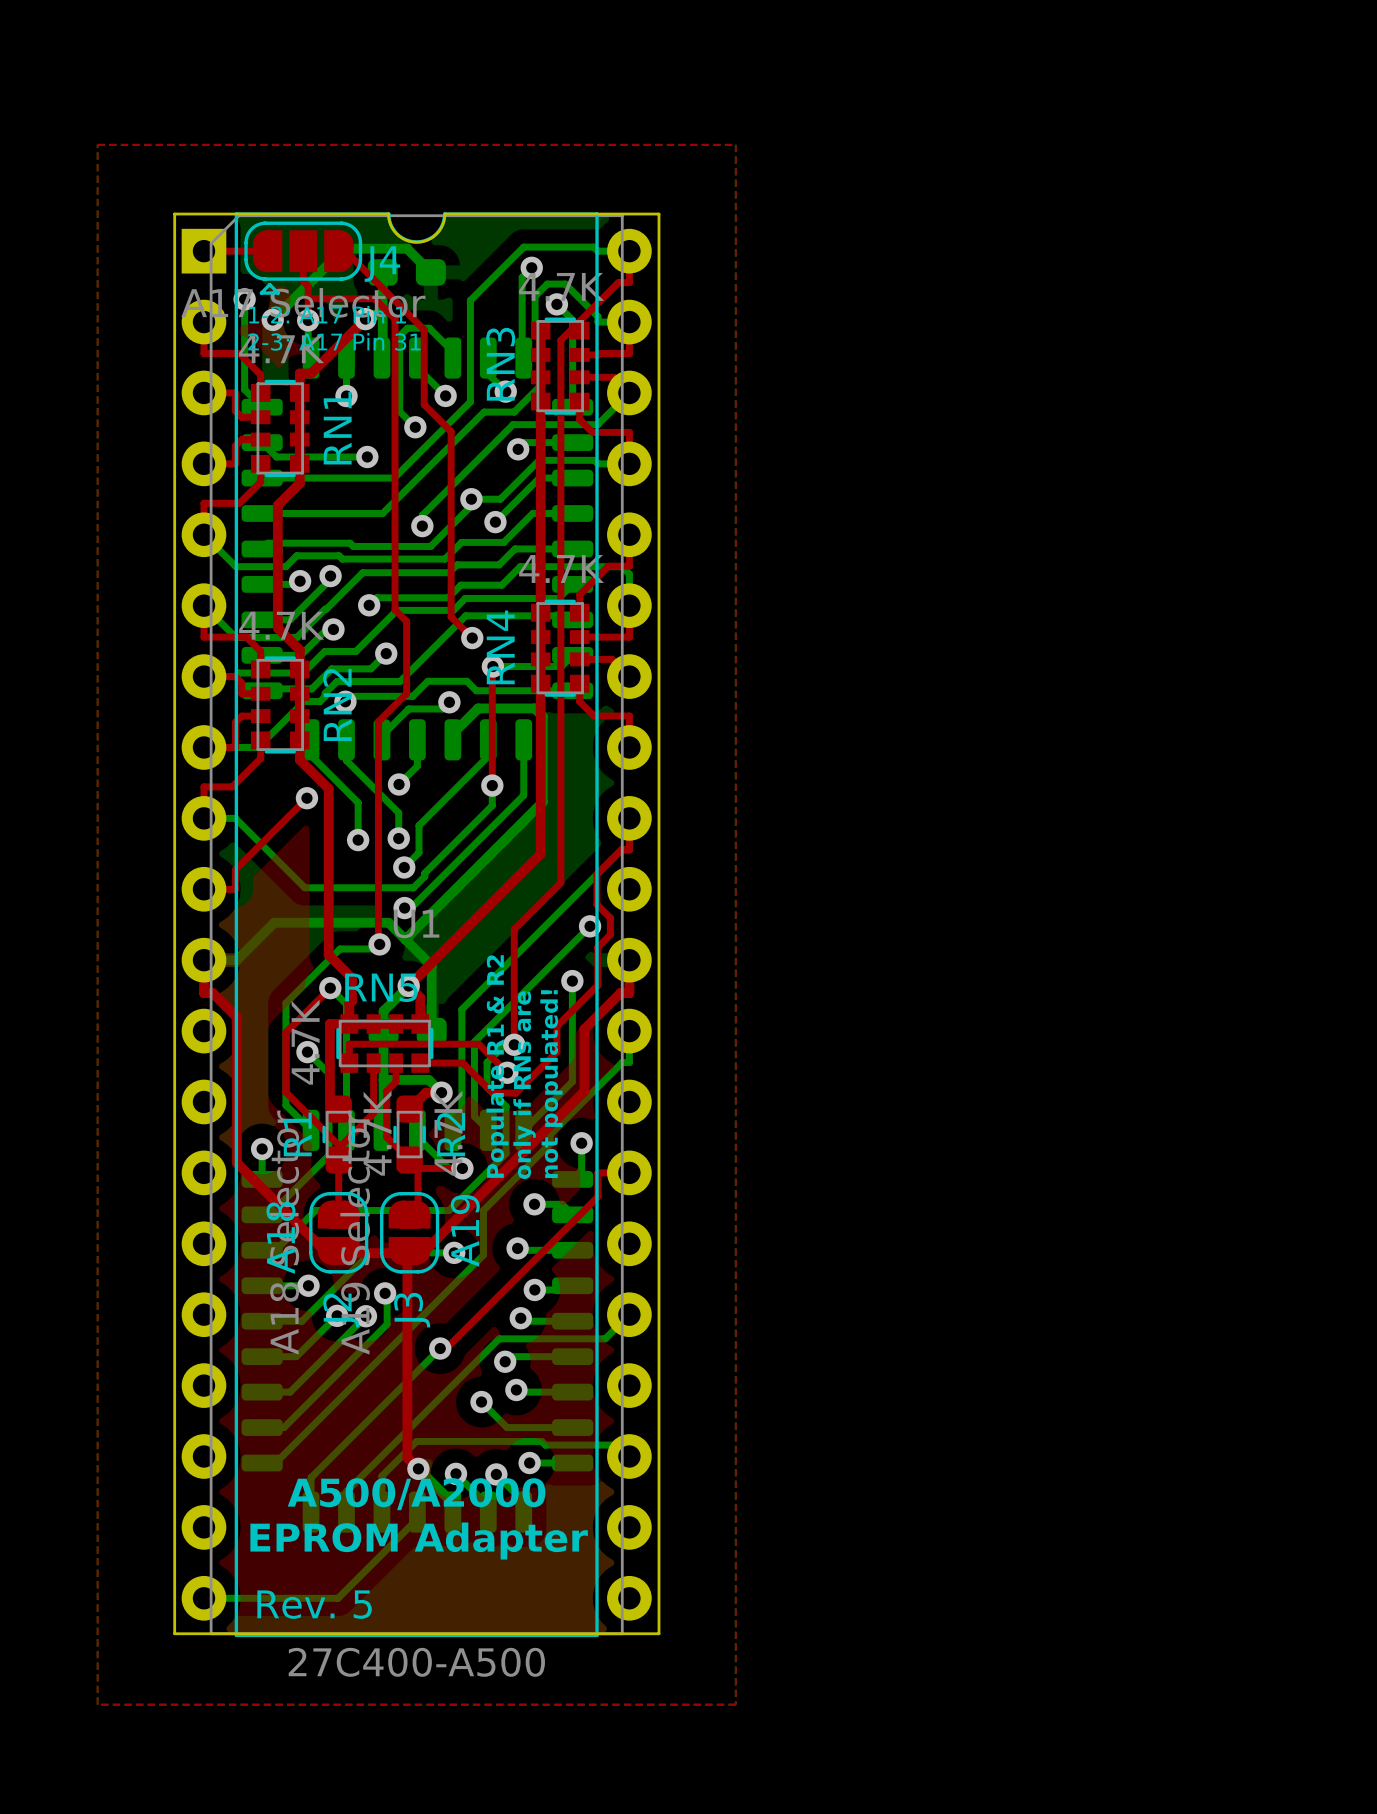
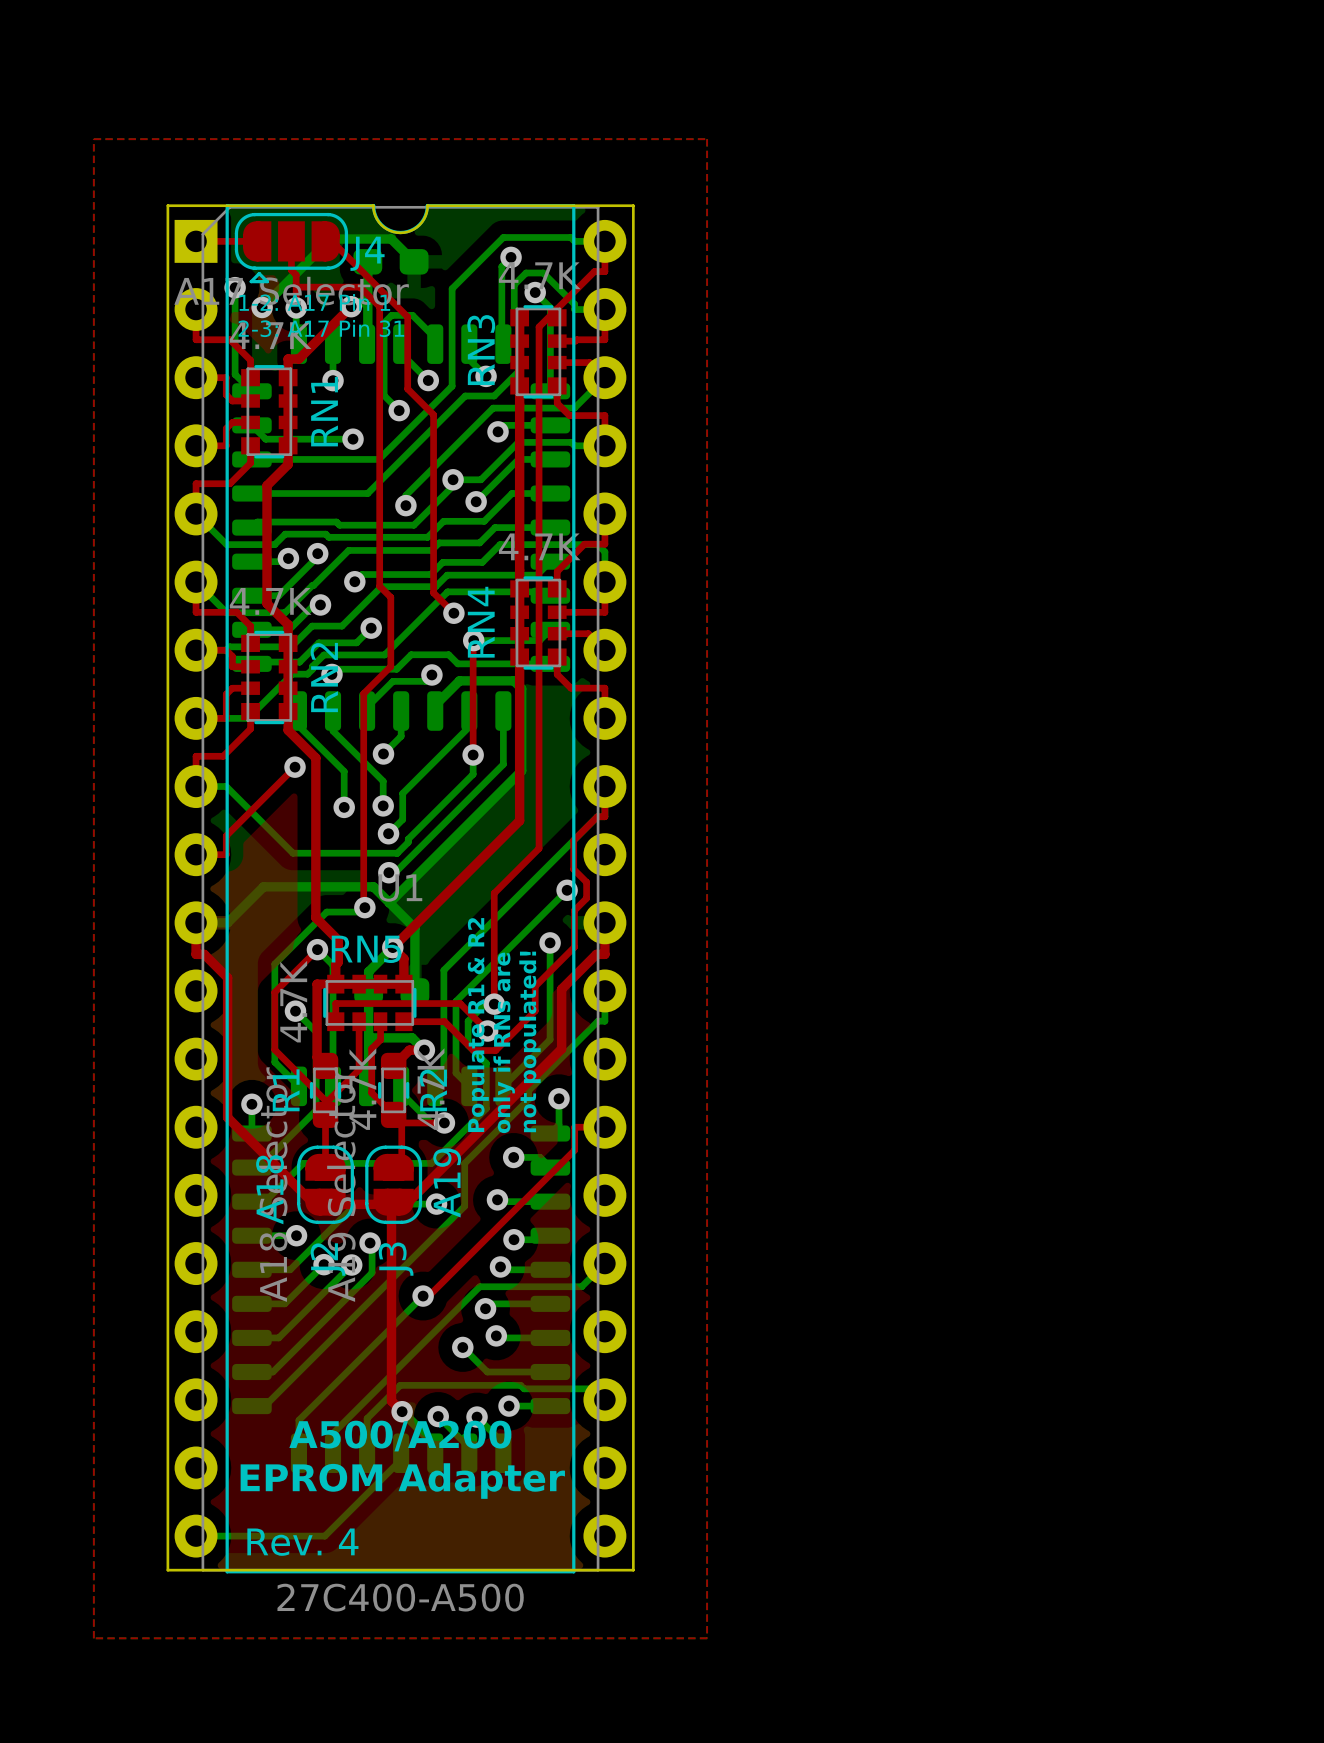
text: A500/A2000 (416, 1494) -> A500/A200 (400, 1436)
text: Rev. 5 (314, 1604) -> Rev. 4 (302, 1542)

